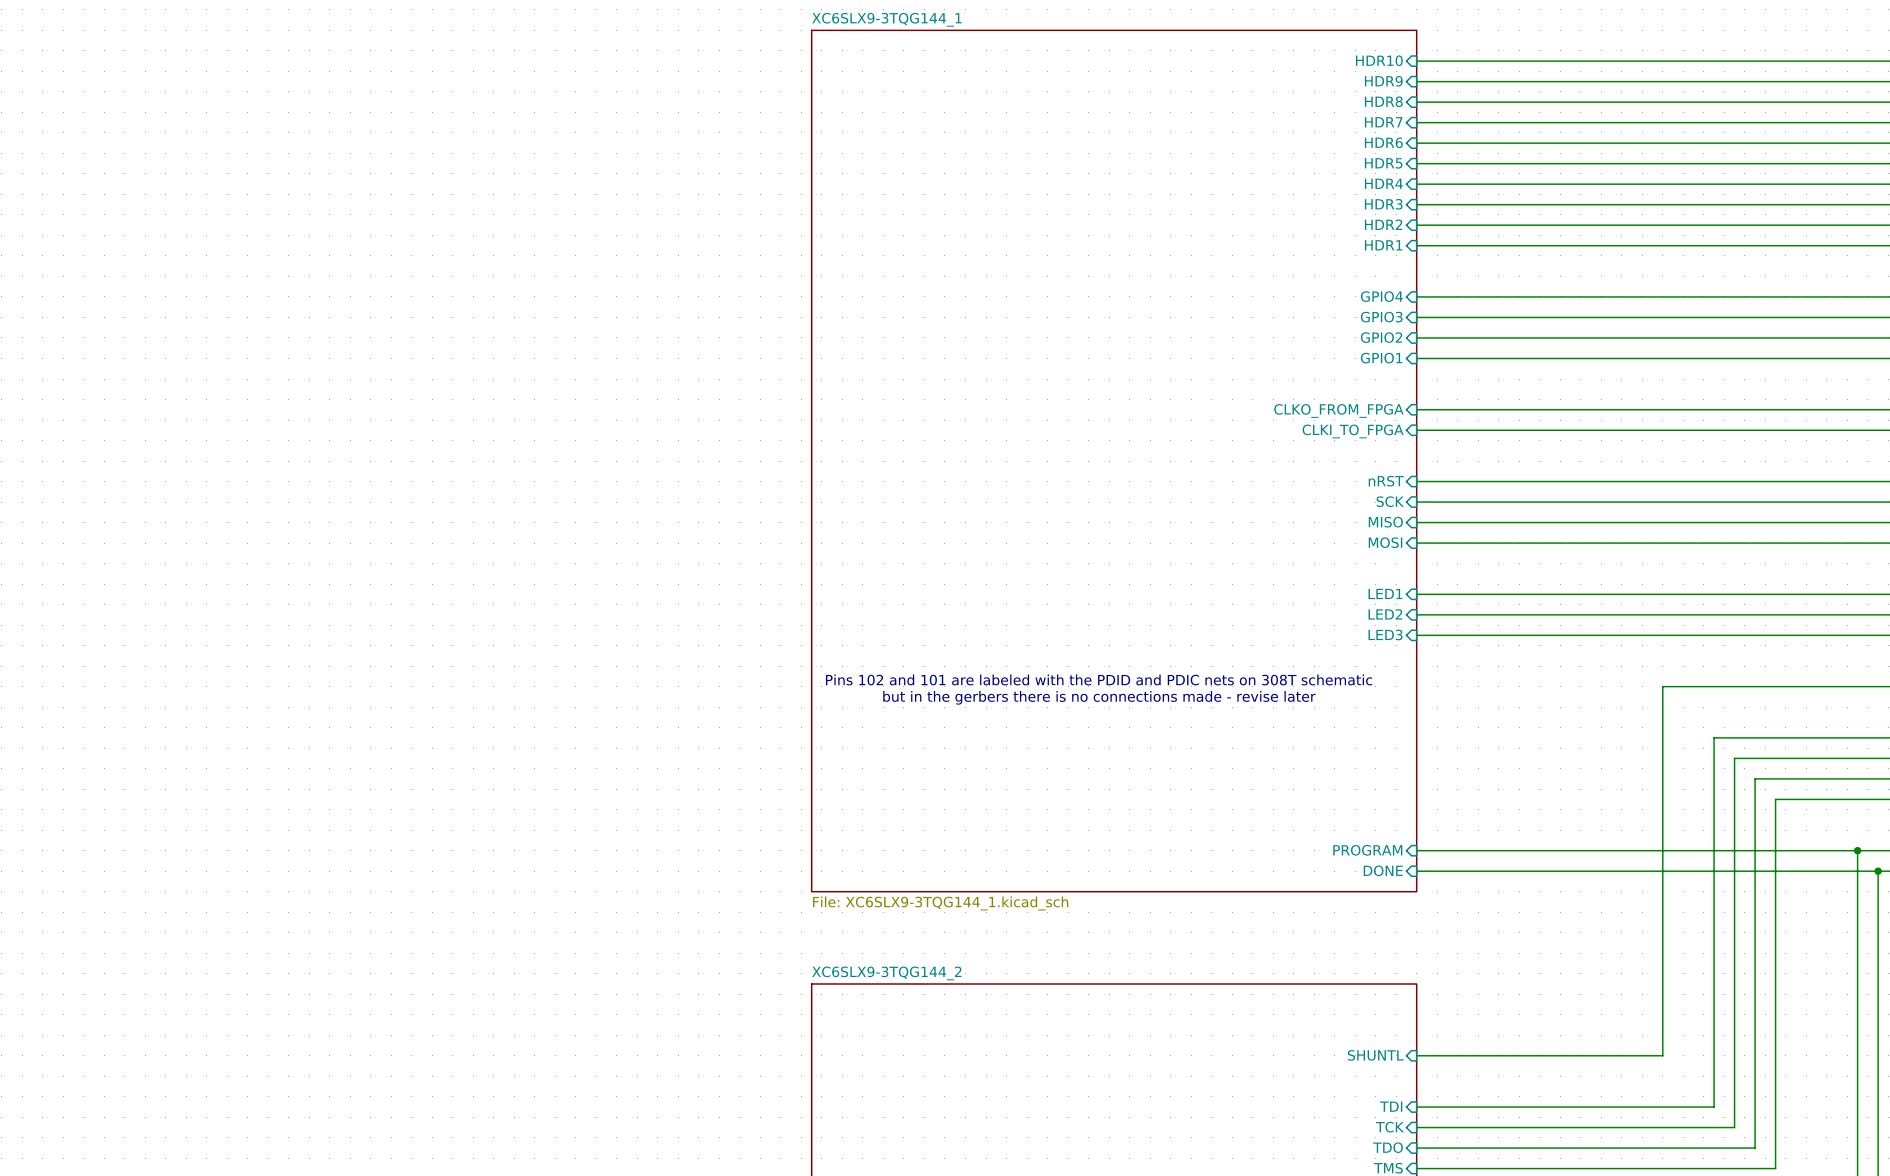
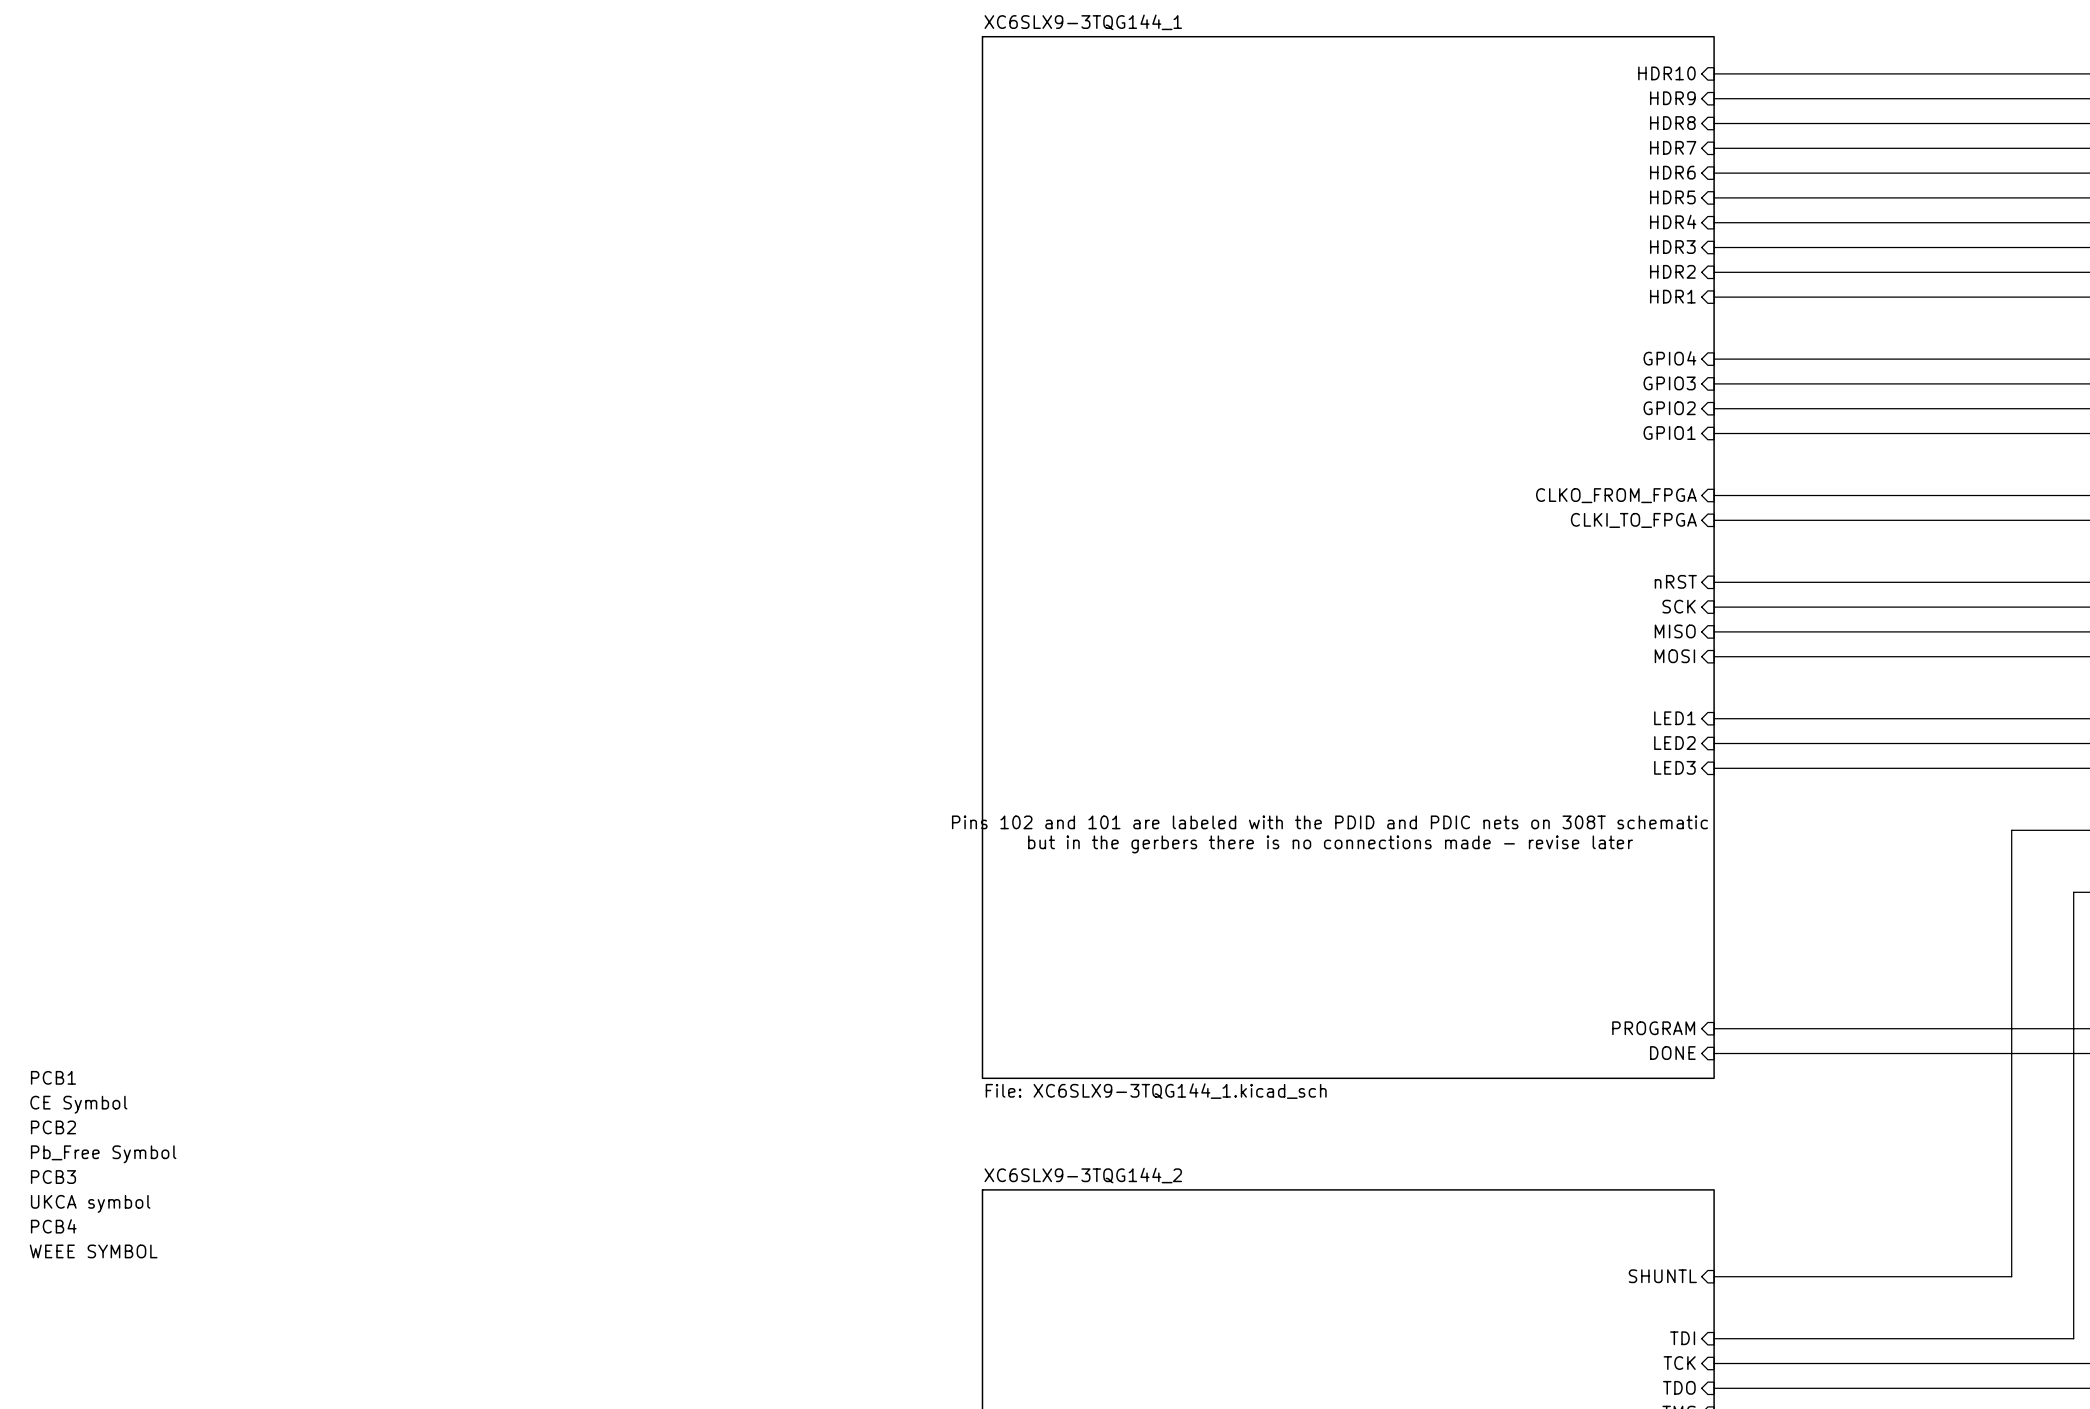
PCB1: none -> CE Symbol (78, 1092)
PCB2: none -> Pb_Free Symbol (103, 1141)
PCB3: none -> UKCA symbol (90, 1191)
PCB4: none -> WEEE SYMBOL (93, 1238)

